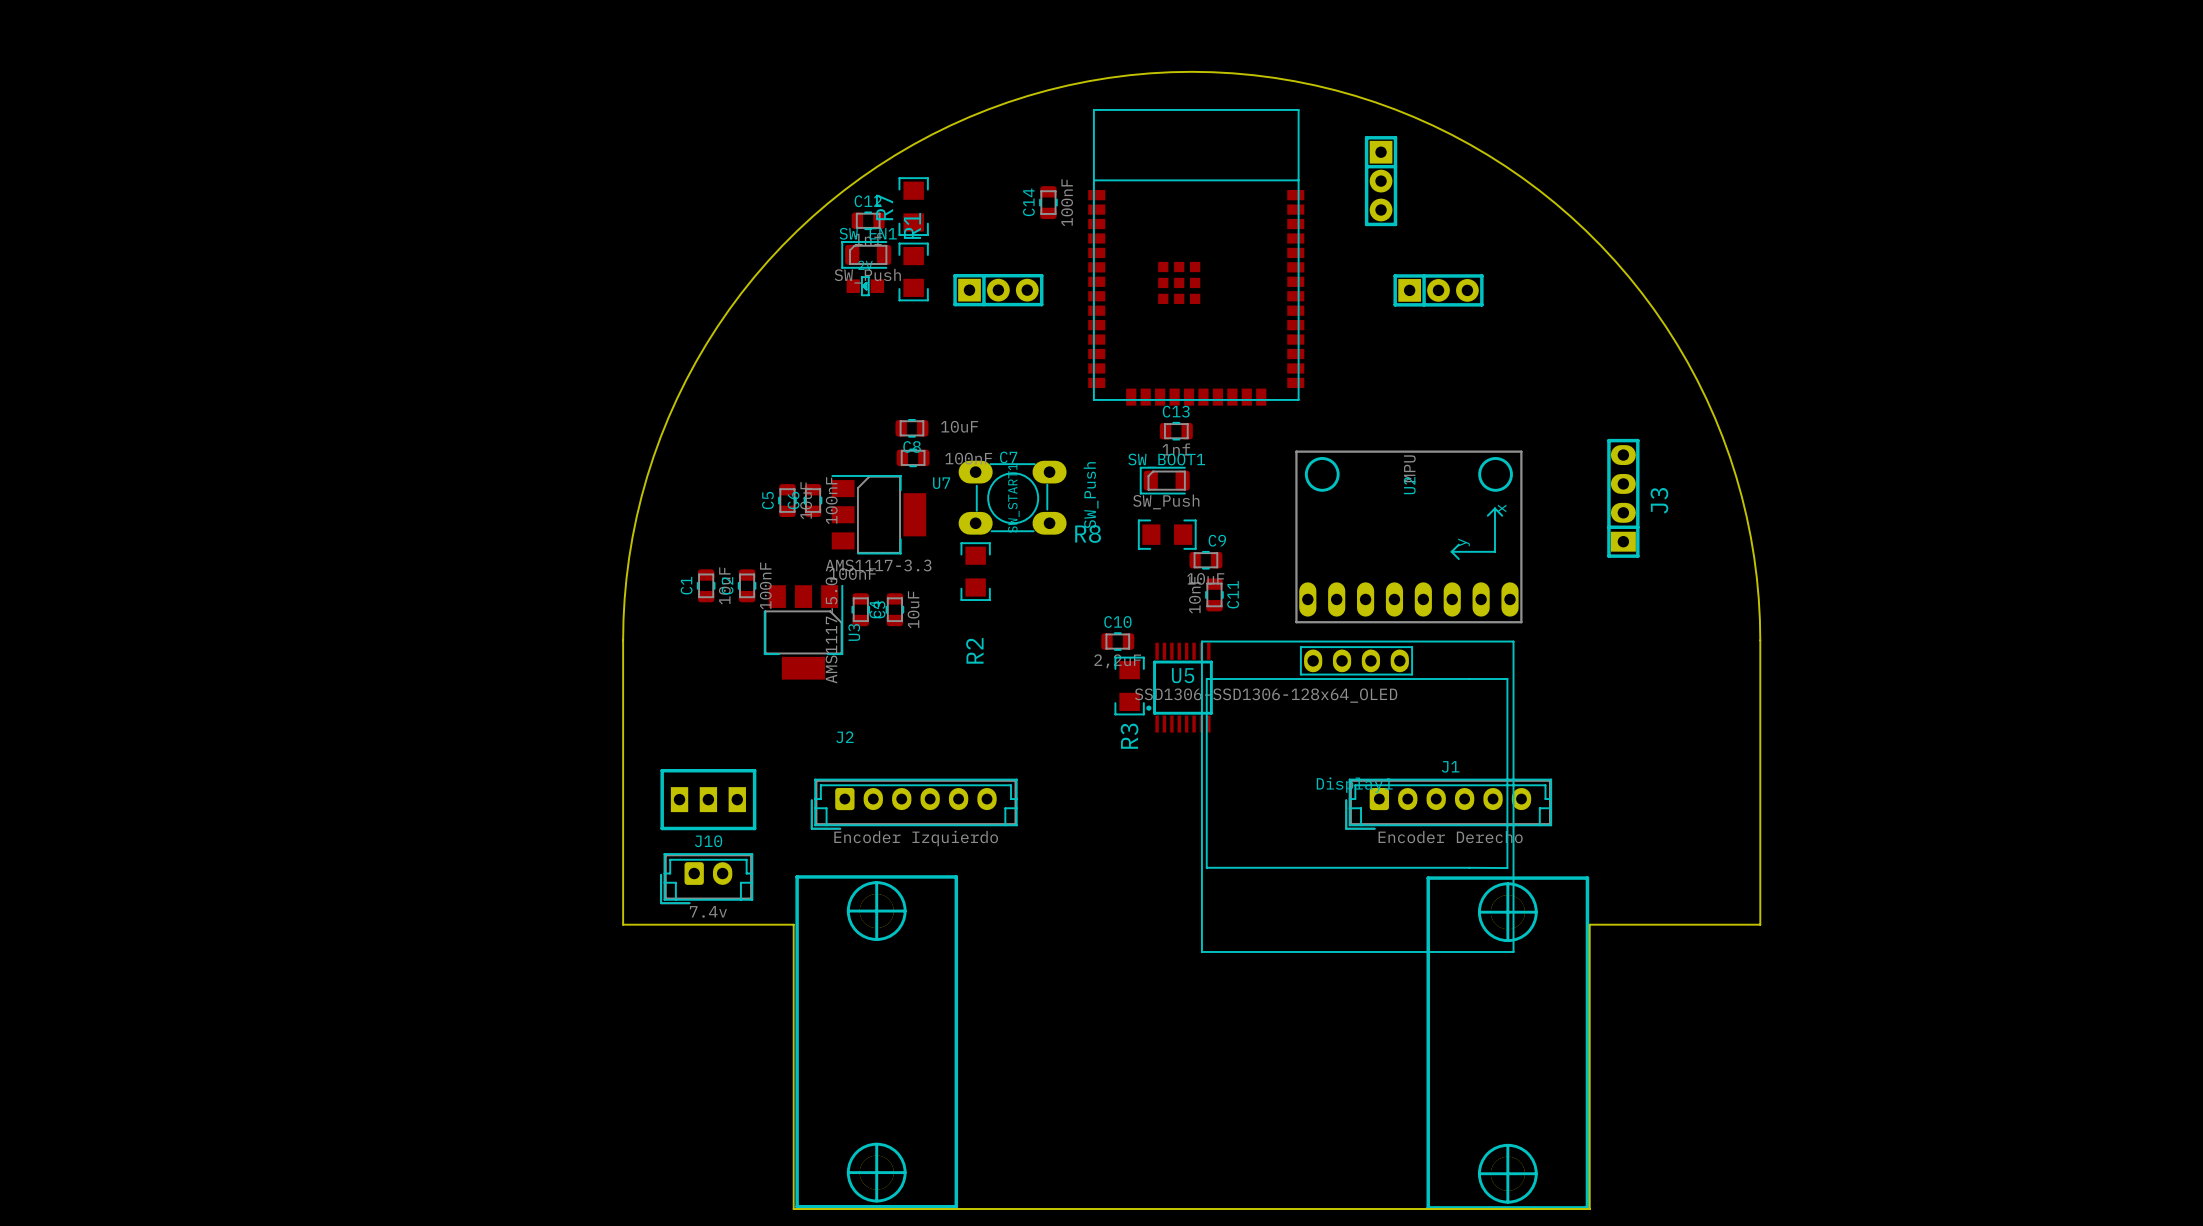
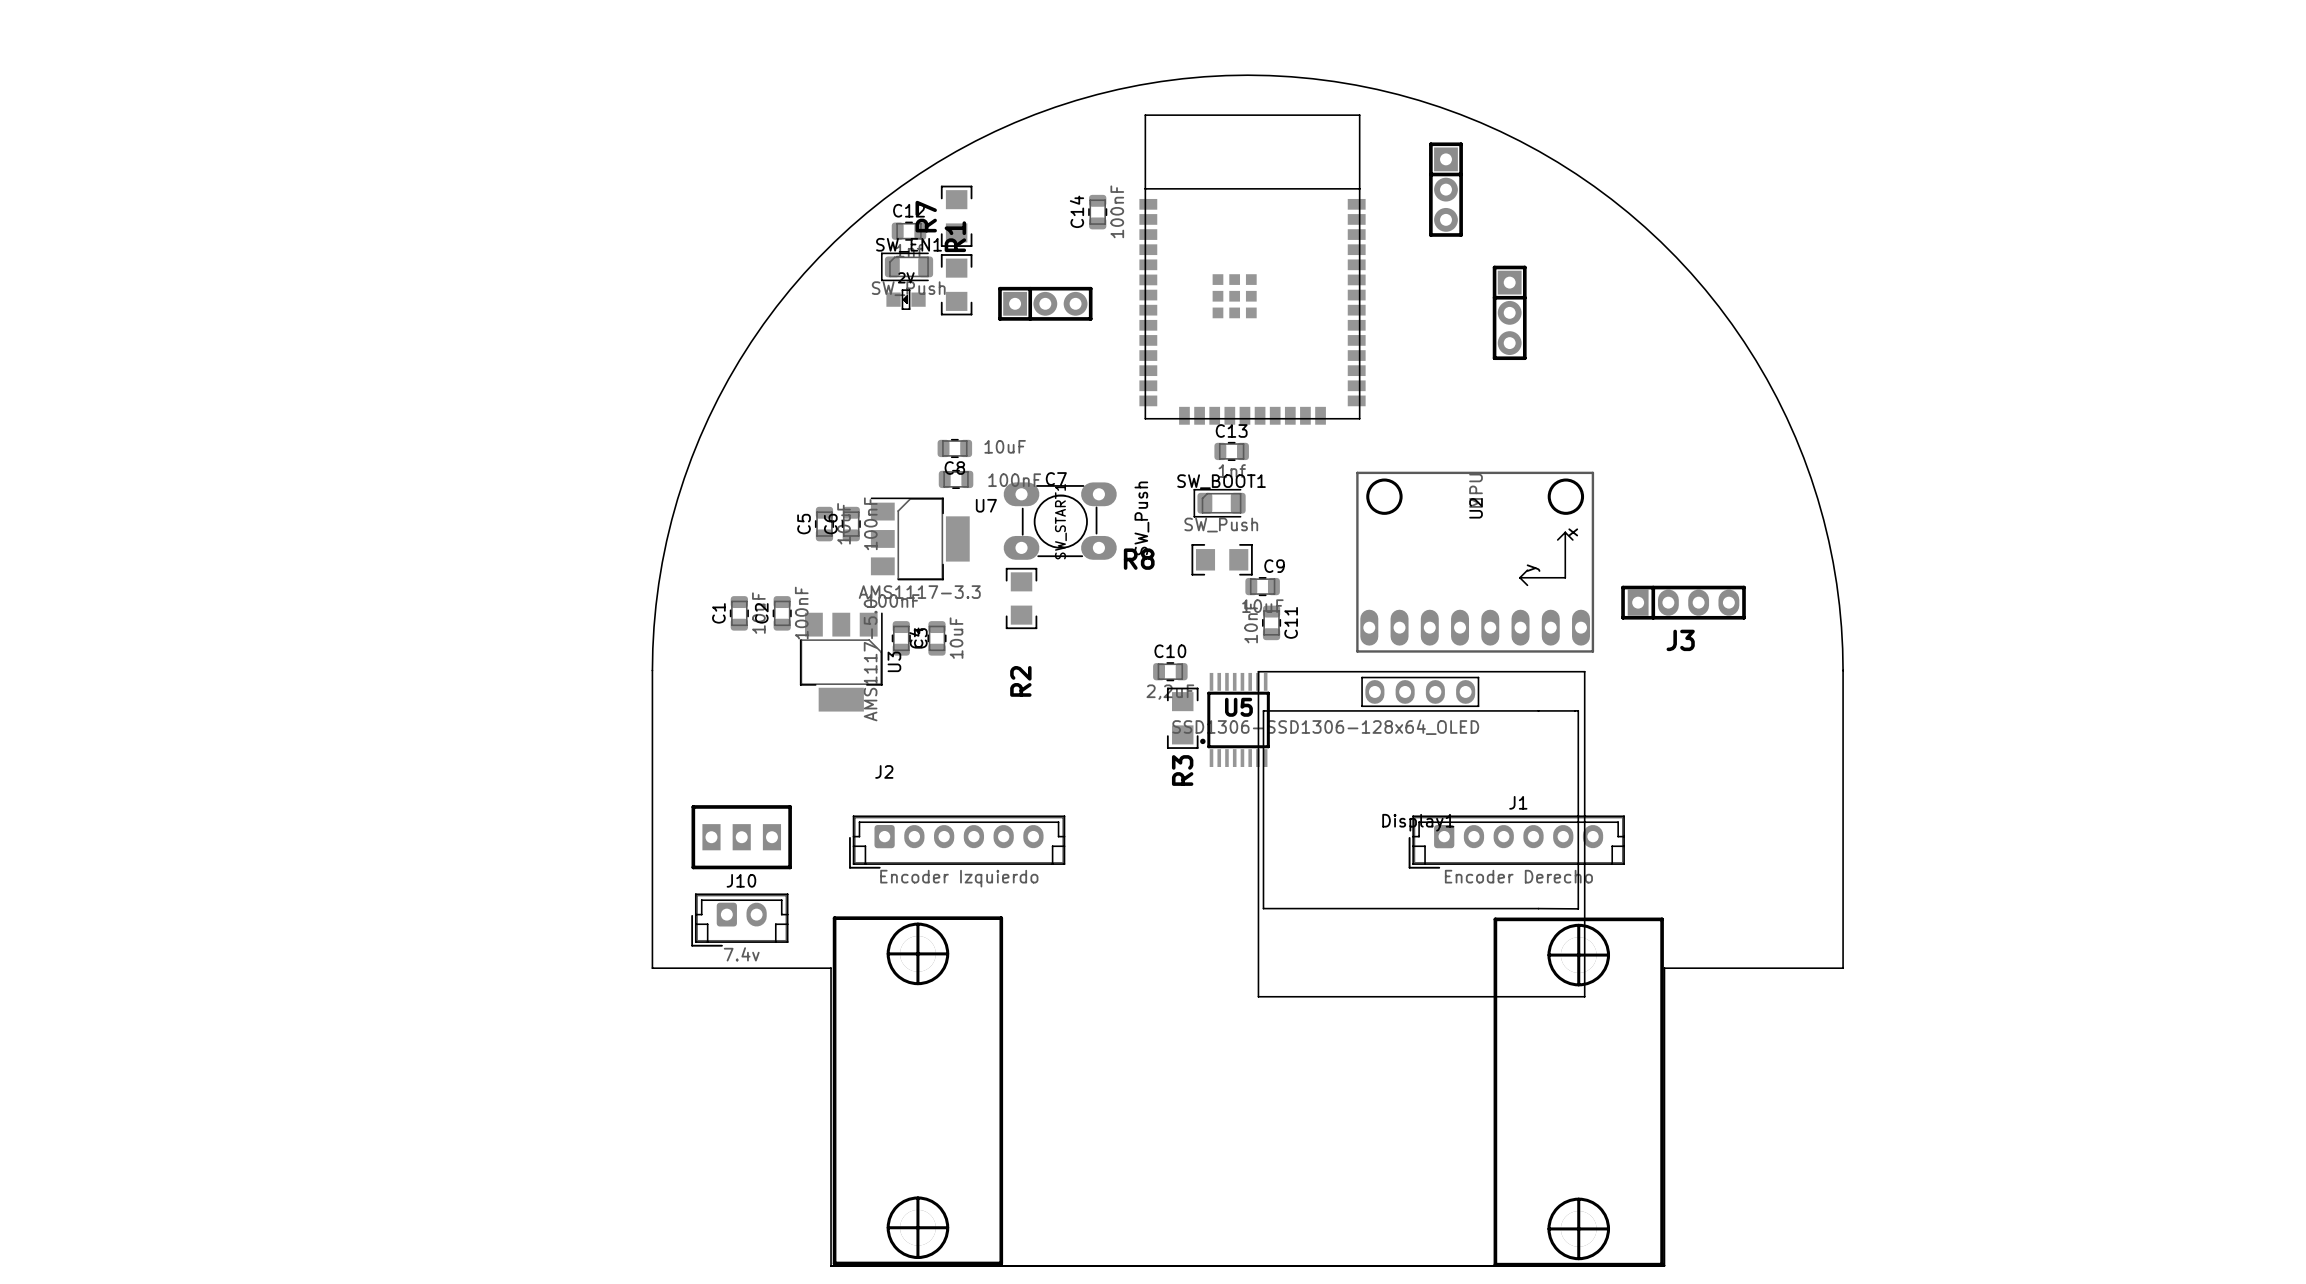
part rotation: 0° (1438, 290) -> 90° clockwise (1509, 312)
J3 rotation: 0° (1623, 498) -> 90° clockwise (1683, 602)
J3 position: (1623, 498) -> (1683, 602)

